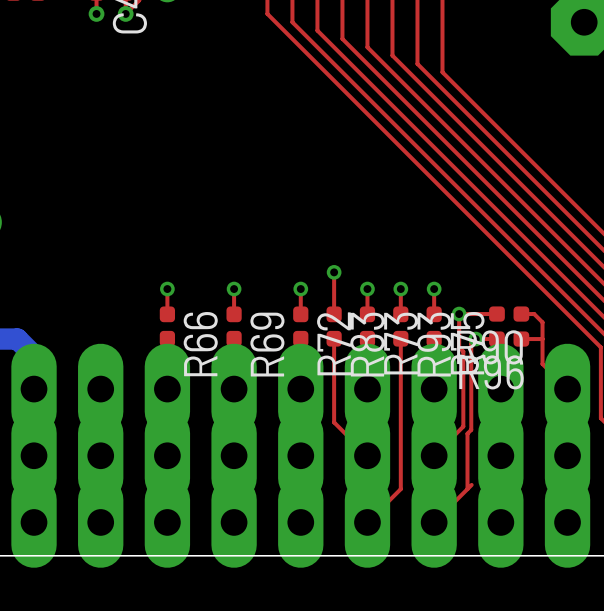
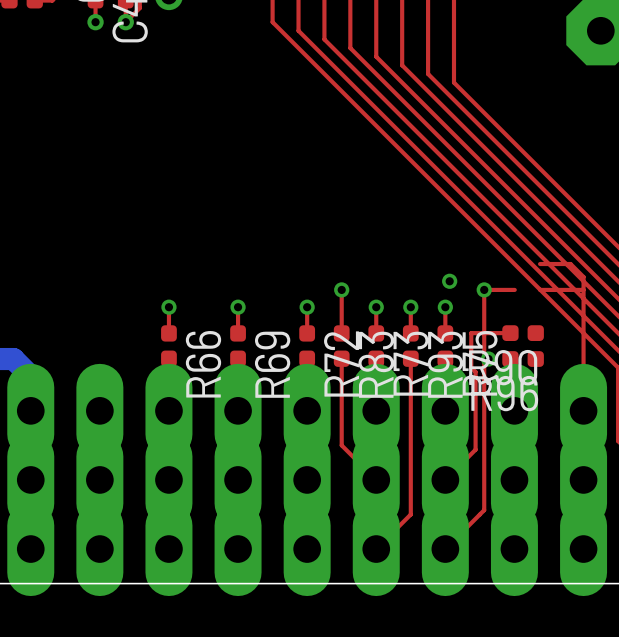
via: none -> (449, 281)
via: none -> (484, 289)
top track: none -> (514, 289) (484, 289) (484, 510)
top track: none -> (540, 289) (583, 289)
via: (459, 314) -> none
top track: (521, 314) (534, 314) (542, 322) (542, 364) (567, 389) -> (540, 264) (570, 264) (583, 276) (583, 410)
top track: (496, 339) (475, 339) (471, 343) (471, 429) (467, 433) (467, 489) -> none
top track: (521, 339) (542, 339) -> none

